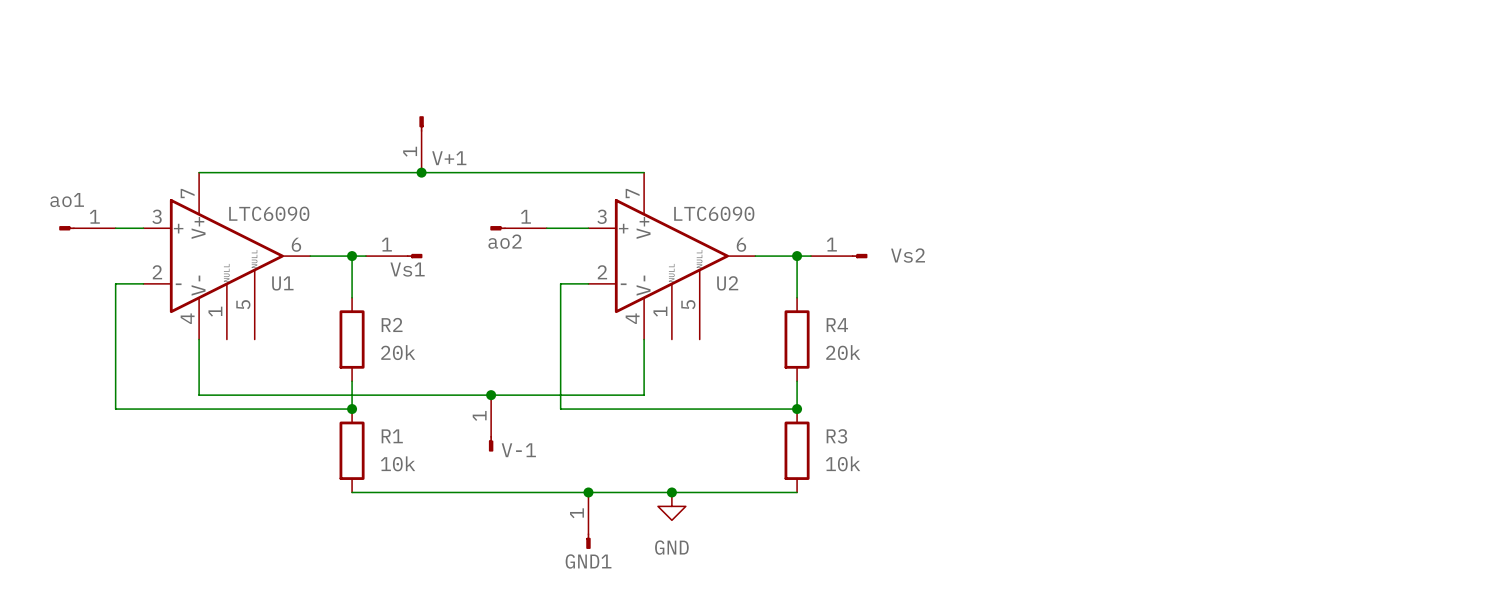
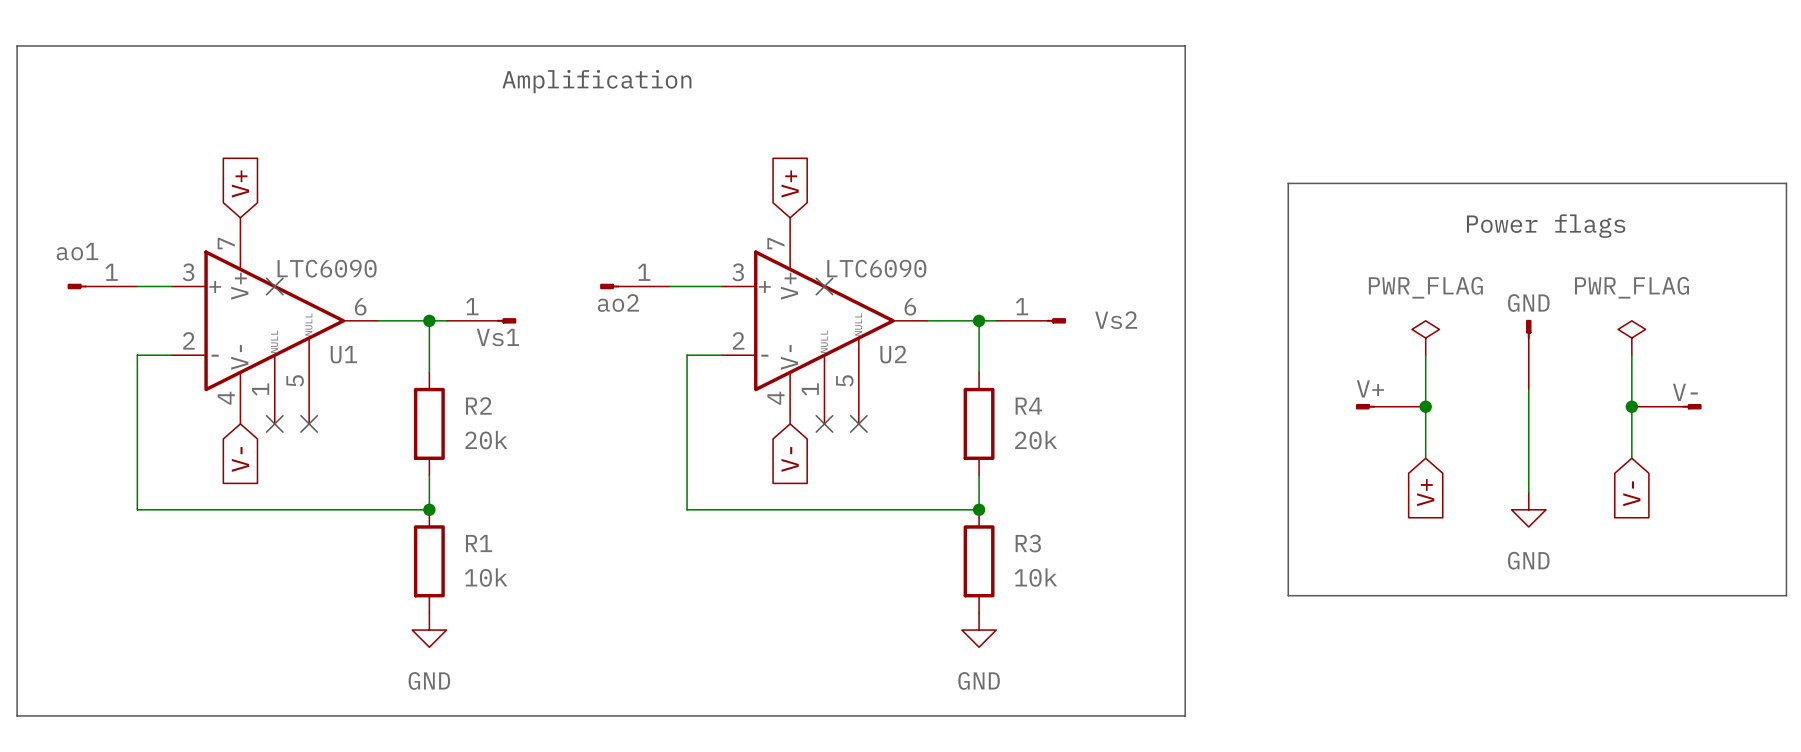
line: none -> (17, 45) (1185, 45) (1185, 715) (17, 715) (17, 45)
text: none -> Amplification (596, 81)
V+1: (421, 144) -> none
line: none -> (1288, 183) (1786, 183) (1786, 595) (1288, 595) (1288, 183)
global label: none -> V+ (240, 184)
global label: none -> V+ (790, 184)
wire: (199, 172) (644, 172) -> none
junction: (421, 172) -> none
text: none -> Power flags (1546, 226)
no-connect mark: none -> (274, 286)
no-connect mark: none -> (824, 286)
power symbol: none -> PWR_FLAG (1425, 338)
power symbol: none -> PWR_FLAG (1631, 338)
wire: none -> (1425, 355) (1425, 458)
part: none -> (1528, 354)
wire: none -> (1631, 355) (1631, 458)
wire: none -> (1528, 389) (1528, 492)
part: none -> (1390, 406)
junction: none -> (1425, 406)
junction: none -> (1631, 406)
part: none -> (1666, 406)
wire: (199, 339) (199, 395) (644, 395) (644, 339) -> none
no-connect mark: none -> (274, 423)
no-connect mark: none -> (309, 423)
no-connect mark: none -> (824, 423)
no-connect mark: none -> (858, 423)
global label: none -> V- (240, 459)
global label: none -> V- (790, 459)
junction: (491, 395) -> none
global label: none -> V+ (1425, 492)
global label: none -> V- (1631, 493)
power symbol: none -> GND (1528, 509)
V-1: (491, 423) -> none
wire: (352, 492) (797, 492) -> none
junction: (588, 492) -> none
junction: (671, 492) -> none
power symbol: none -> GND (429, 630)
power symbol position: GND (671, 506) -> GND (979, 630)
GND1: (588, 520) -> none

